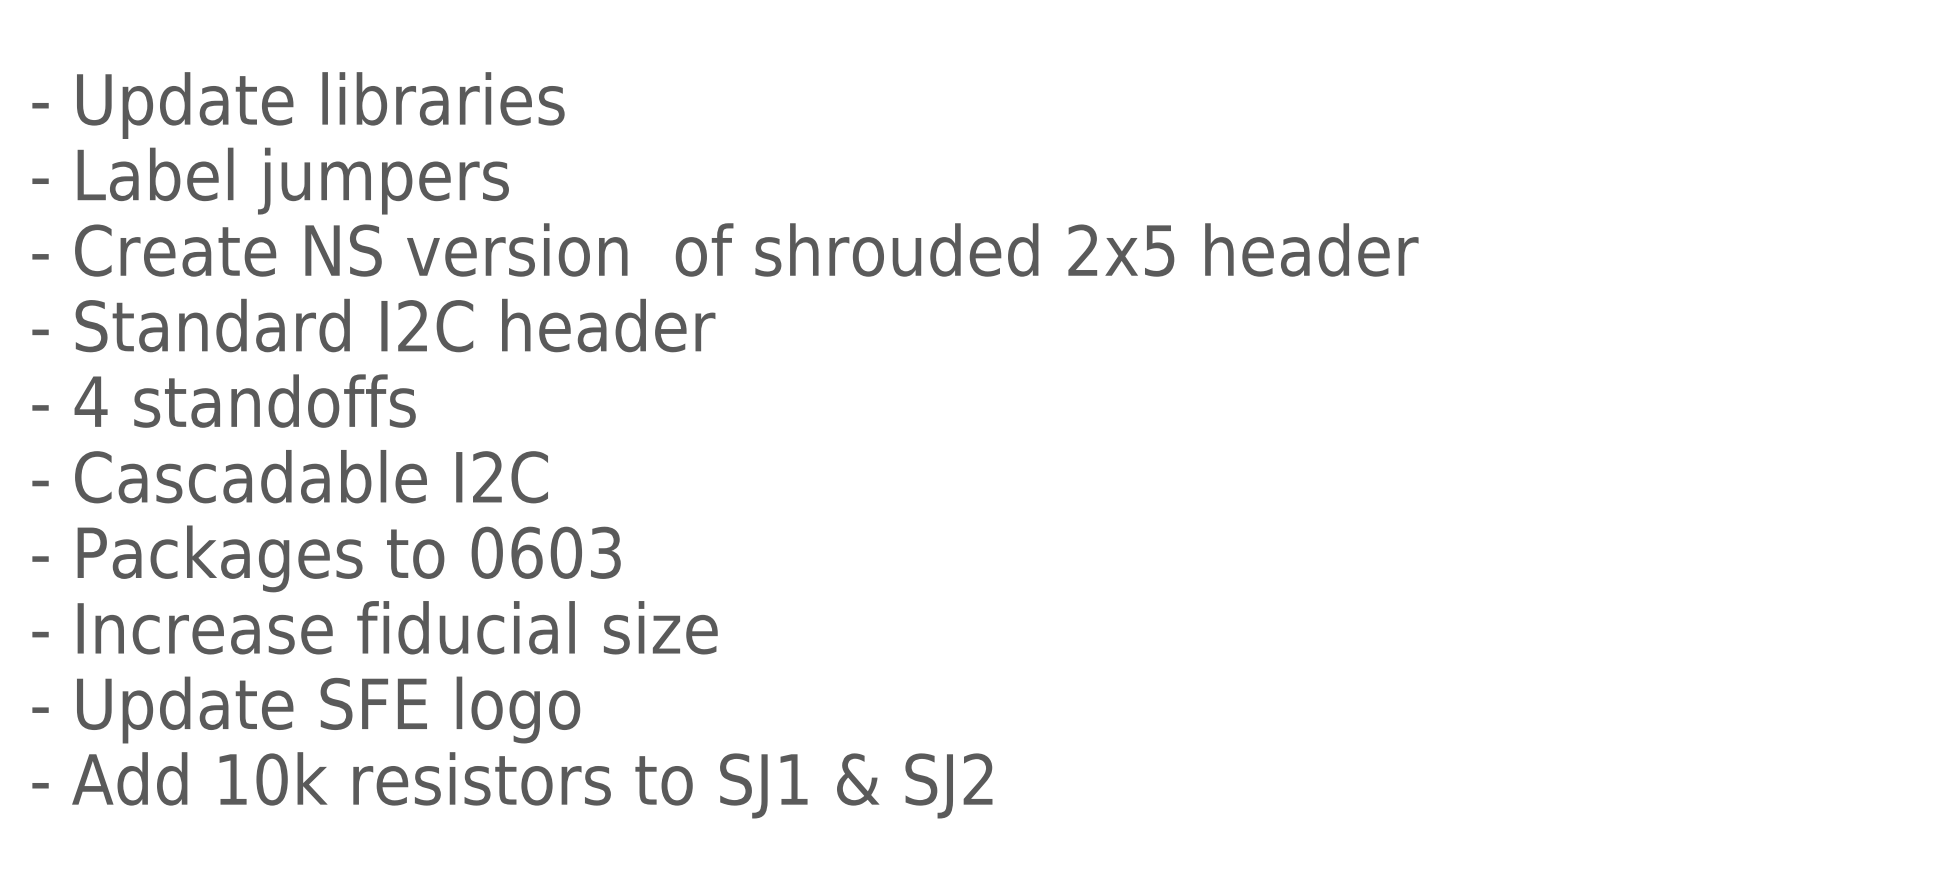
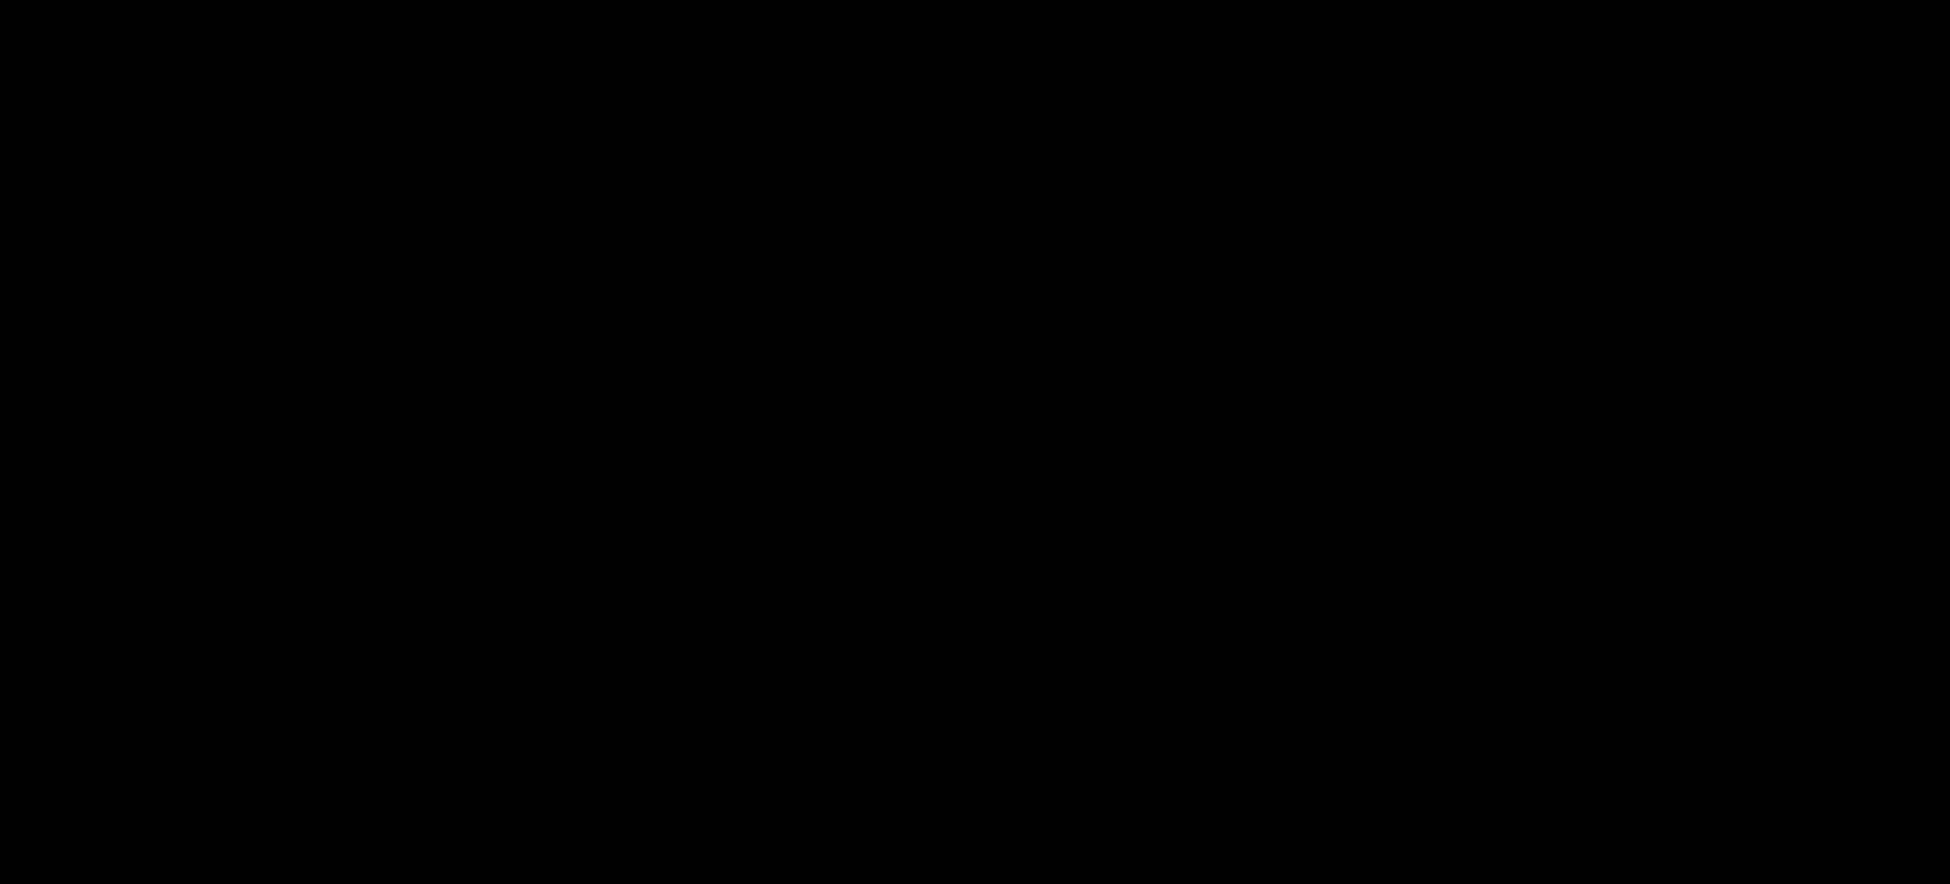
text: - Update libraries (298, 105) -> none
text: - Label jumpers (270, 181) -> none
text: - Create NS version of shrouded 2x5 header (725, 249) -> none
text: - Standard I2C header (373, 325) -> none
text: - 4 standoffs (224, 401) -> none
text: - Cascadable I2C (290, 476) -> none
text: - Packages to 0603 (326, 558) -> none
text: - Increase fiducial size (375, 627) -> none
text: - Update SFE logo (306, 710) -> none
text: - Add 10k resistors to SJ1 & SJ2 (512, 785) -> none

